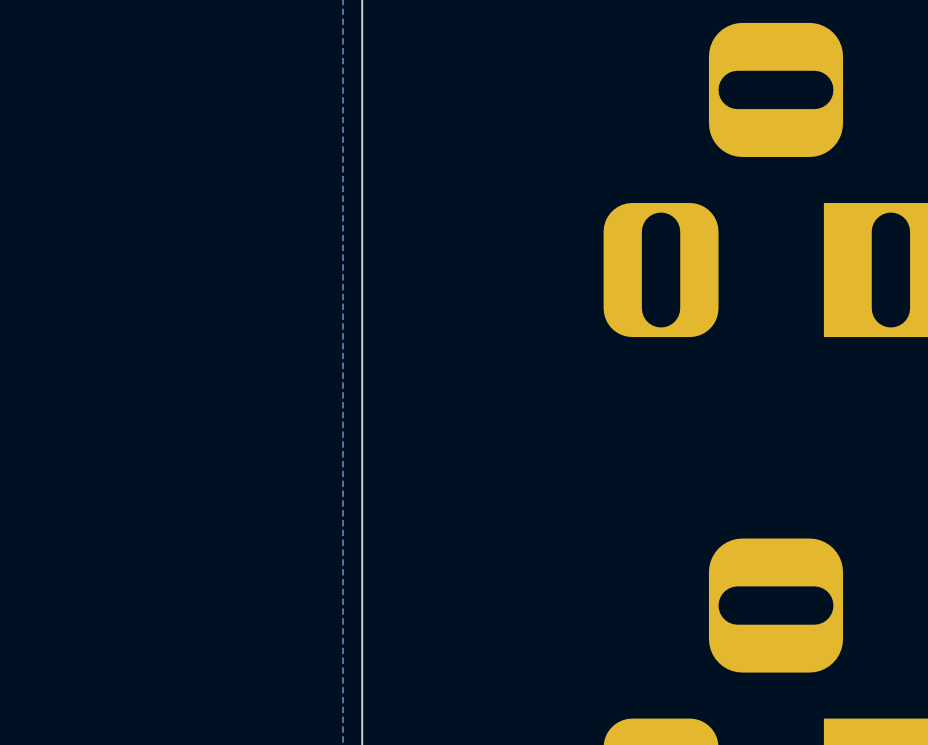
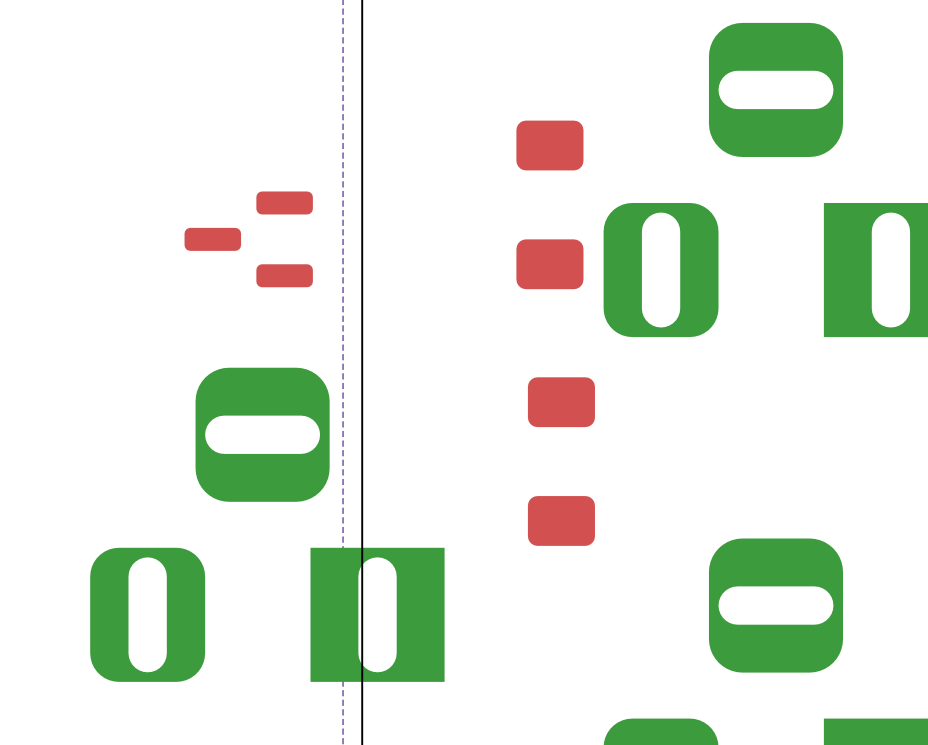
part: none -> (549, 204)
part: none -> (248, 239)
part: none -> (561, 461)
part: none -> (267, 524)

